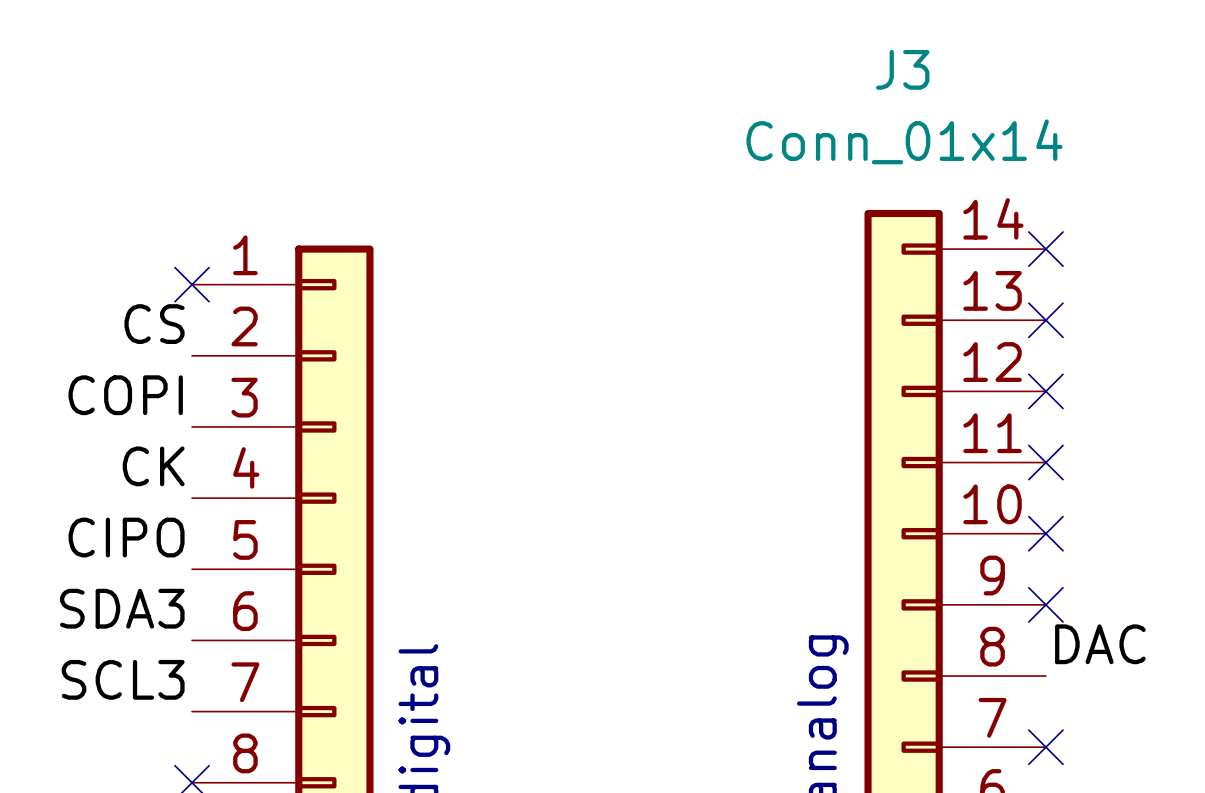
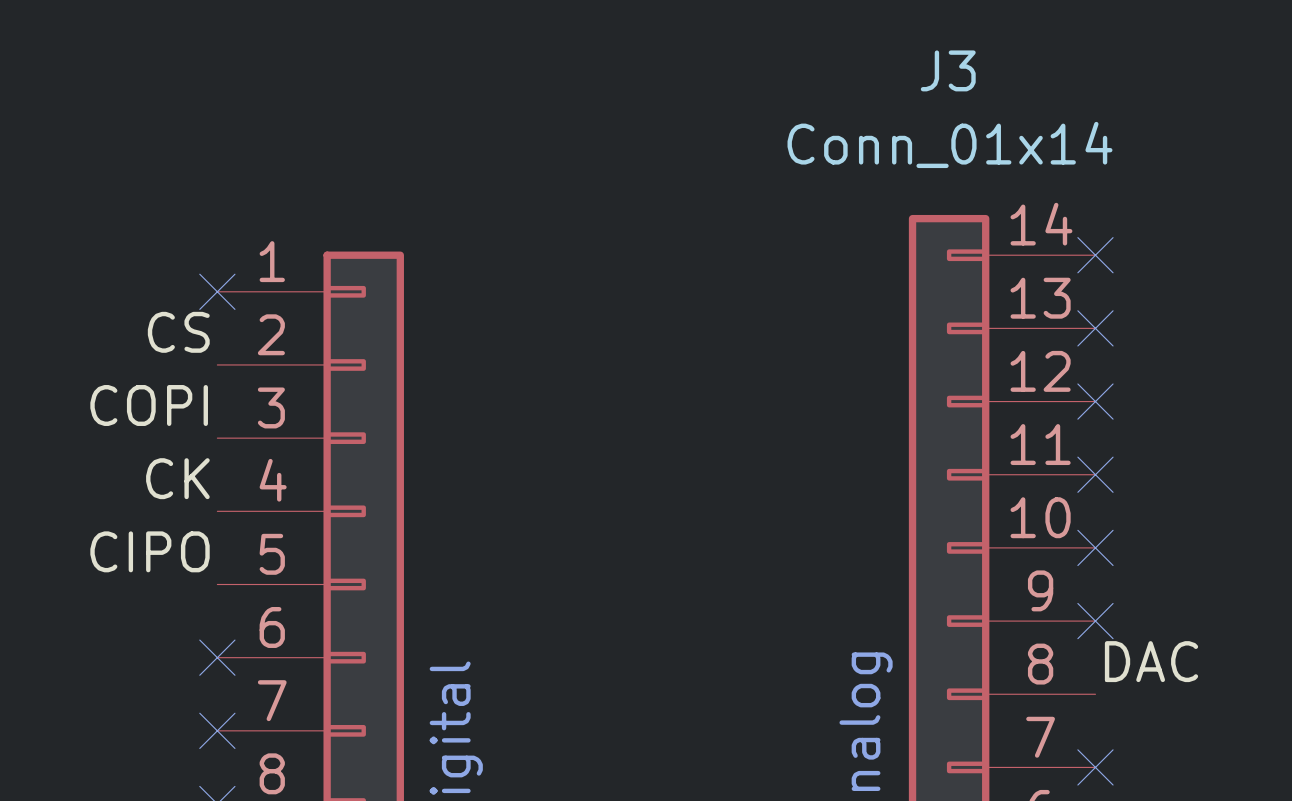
label: SDA3 (122, 608) -> none
no-connect mark: none -> (217, 657)
label: SCL3 (123, 679) -> none
no-connect mark: none -> (217, 730)

